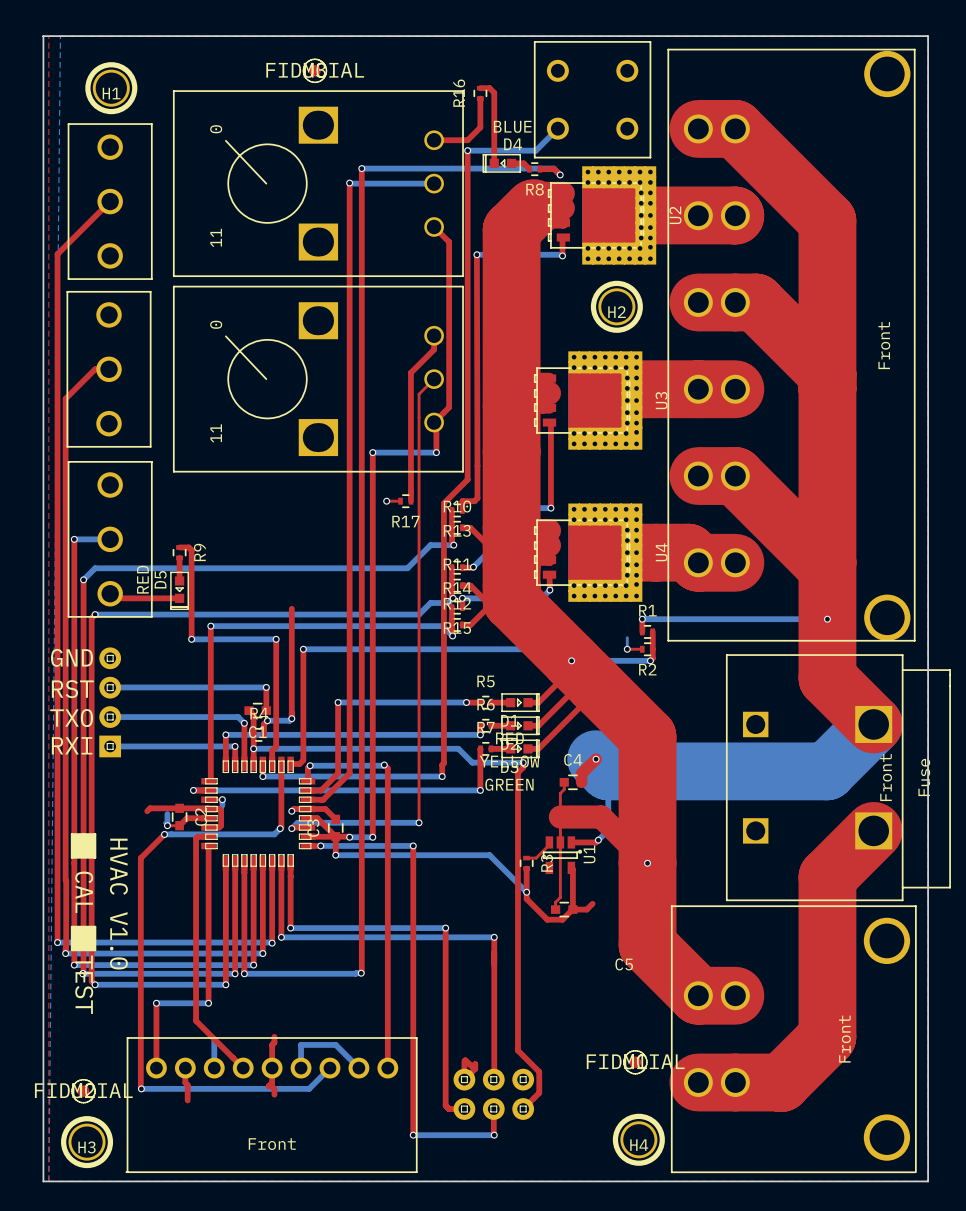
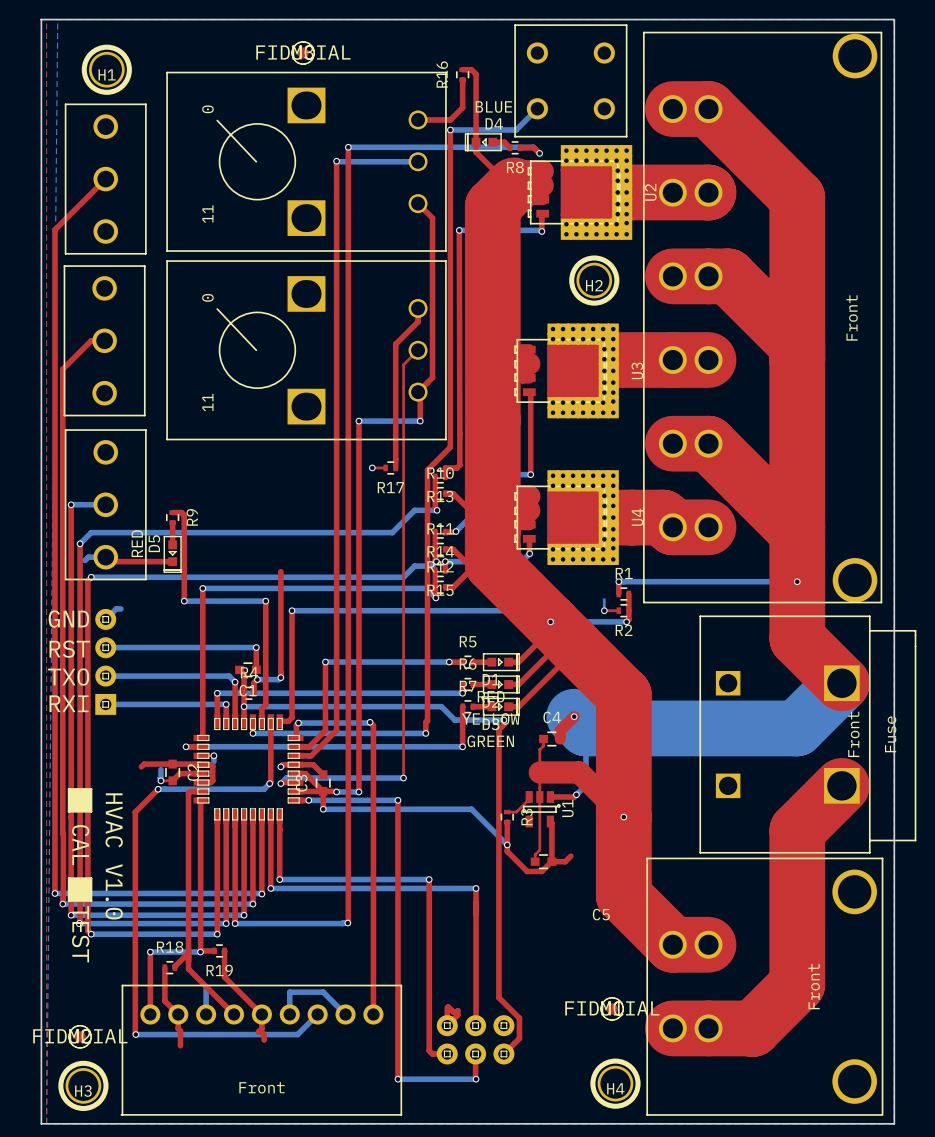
top track: none -> (476, 142) (476, 152) (501, 177) (507, 177)
bottom track: none -> (105, 557) (88, 557) (85, 560)
bottom track: none -> (120, 608) (116, 608) (105, 619)
top track: none -> (214, 950) (200, 951)
R19: none -> (219, 950)
top track: none -> (188, 952) (174, 967)
top track: none -> (164, 967) (164, 1001) (178, 1014)
R18: none -> (169, 967)
top track: (274, 1036) (274, 1042) (272, 1044) (272, 1068) -> (224, 950) (224, 977) (261, 1014)

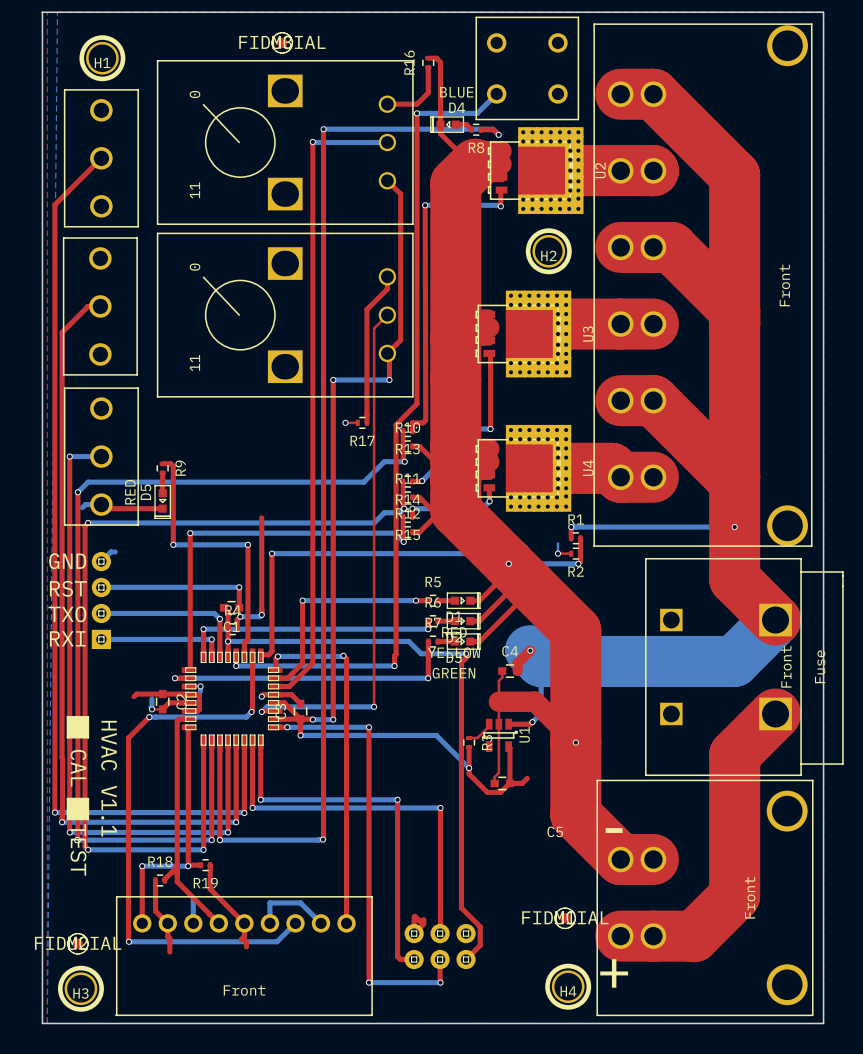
text: HVAC V1.0 (114, 856) -> HVAC V1.1 (109, 778)
text: none -> - (614, 830)
text: none -> + (614, 973)

